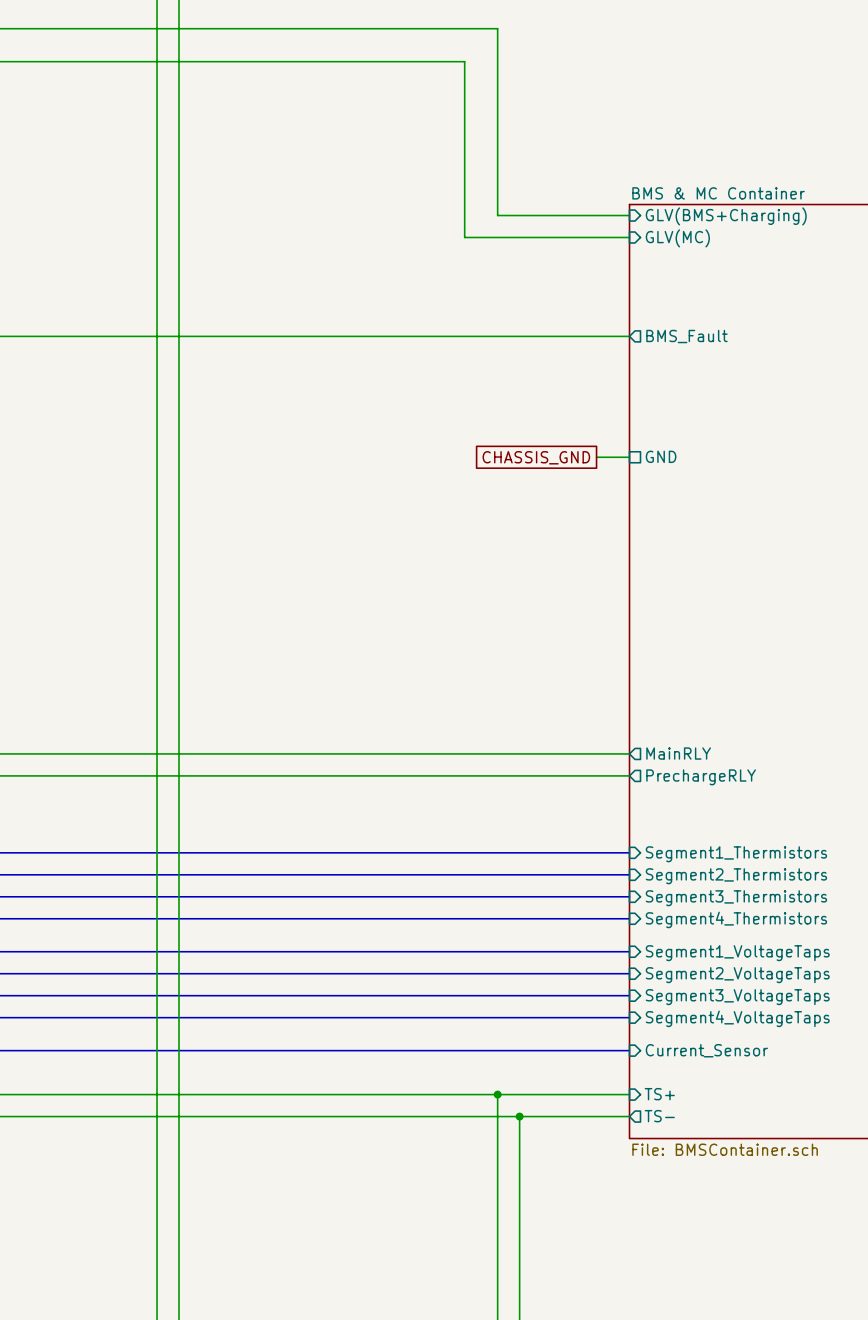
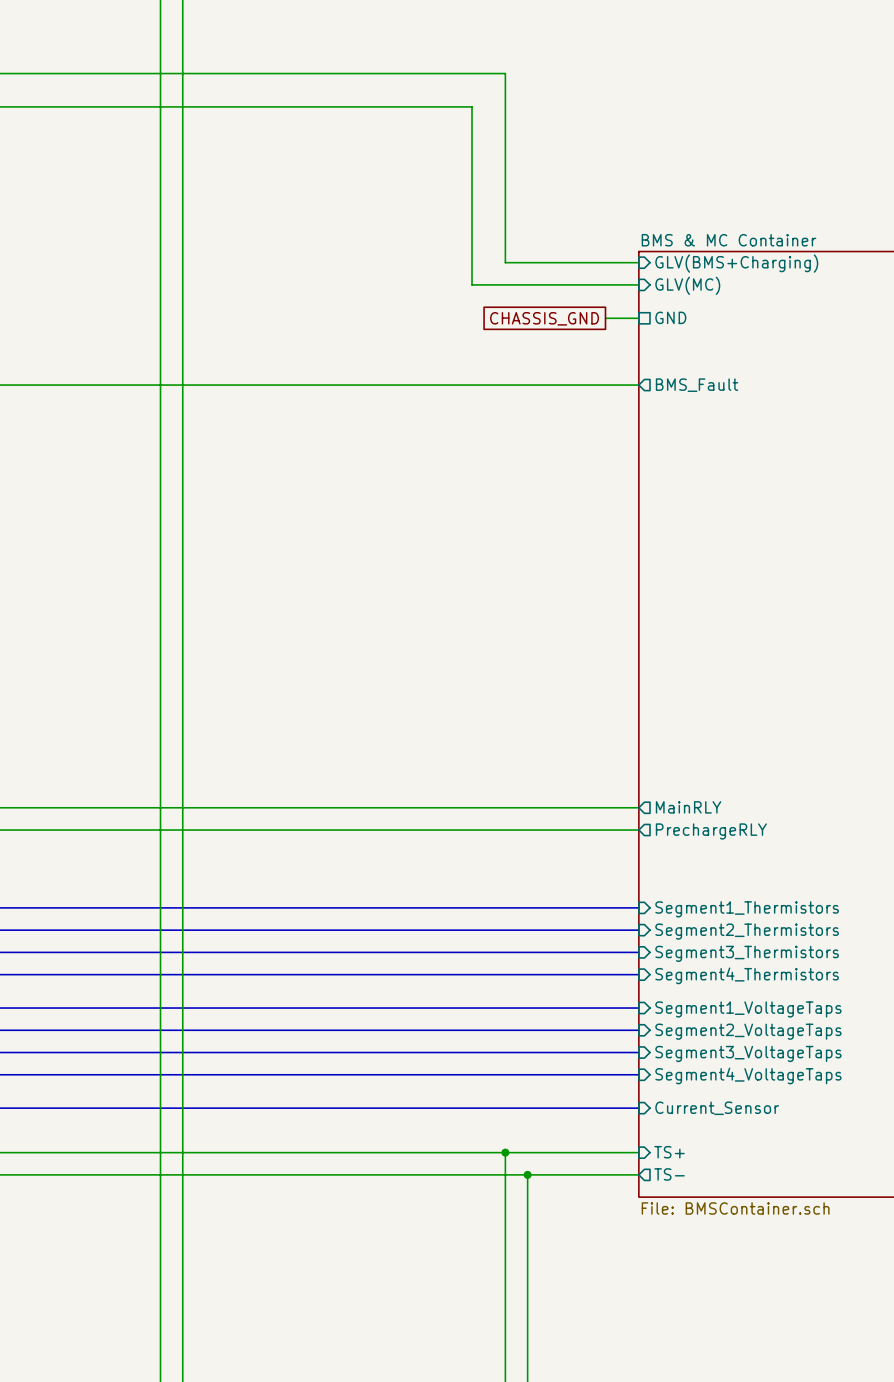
sheet pin position: GND (661, 456) -> GND (670, 317)
global label position: CHASSIS_GND (536, 457) -> CHASSIS_GND (544, 318)
wire: (596, 457) (629, 457) -> (605, 318) (638, 318)

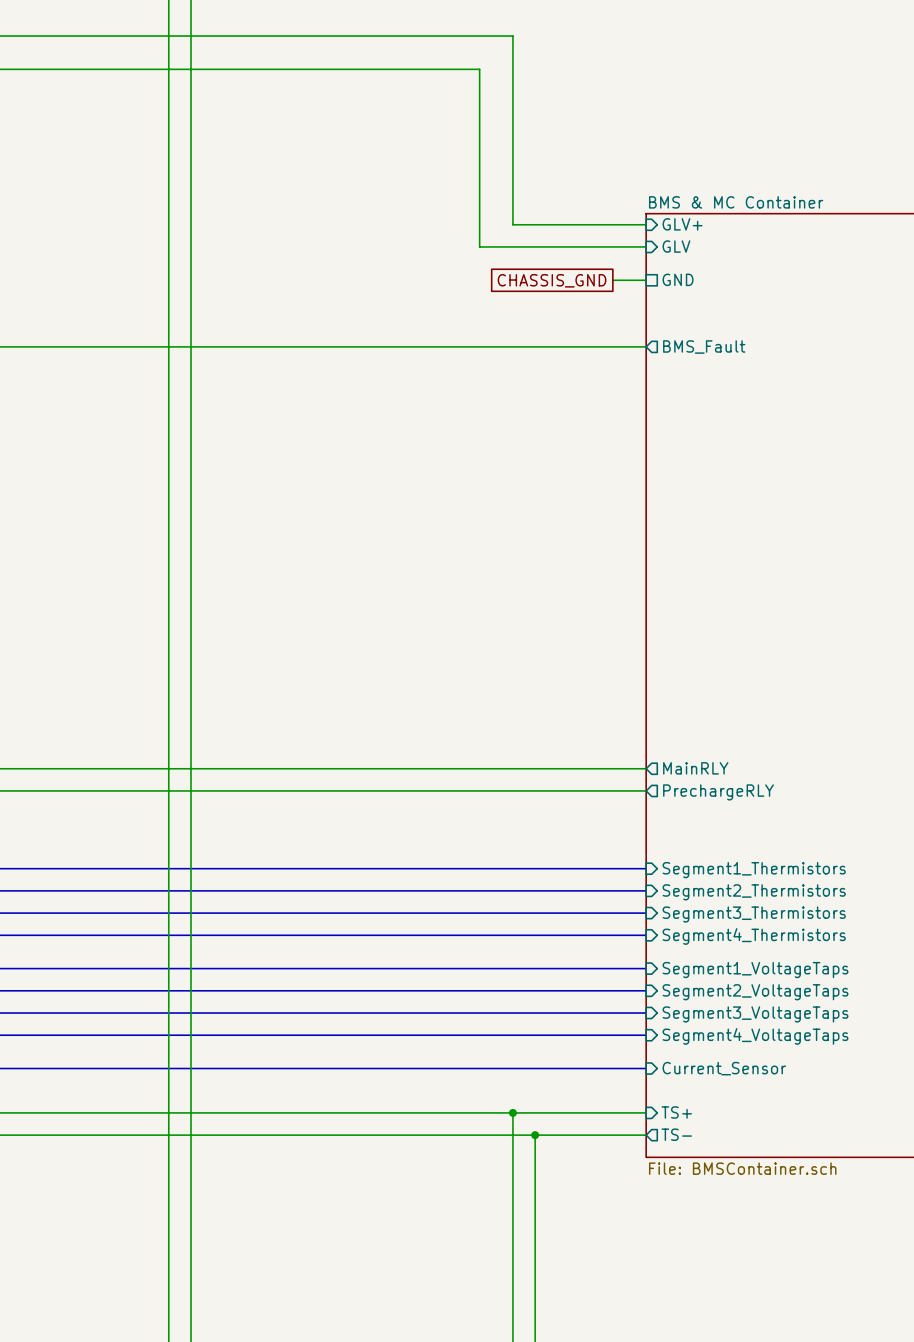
sheet pin: GLV(BMS+Charging) (736, 263) -> GLV+ (682, 224)
sheet pin: GLV(MC) (687, 285) -> GLV (676, 246)

